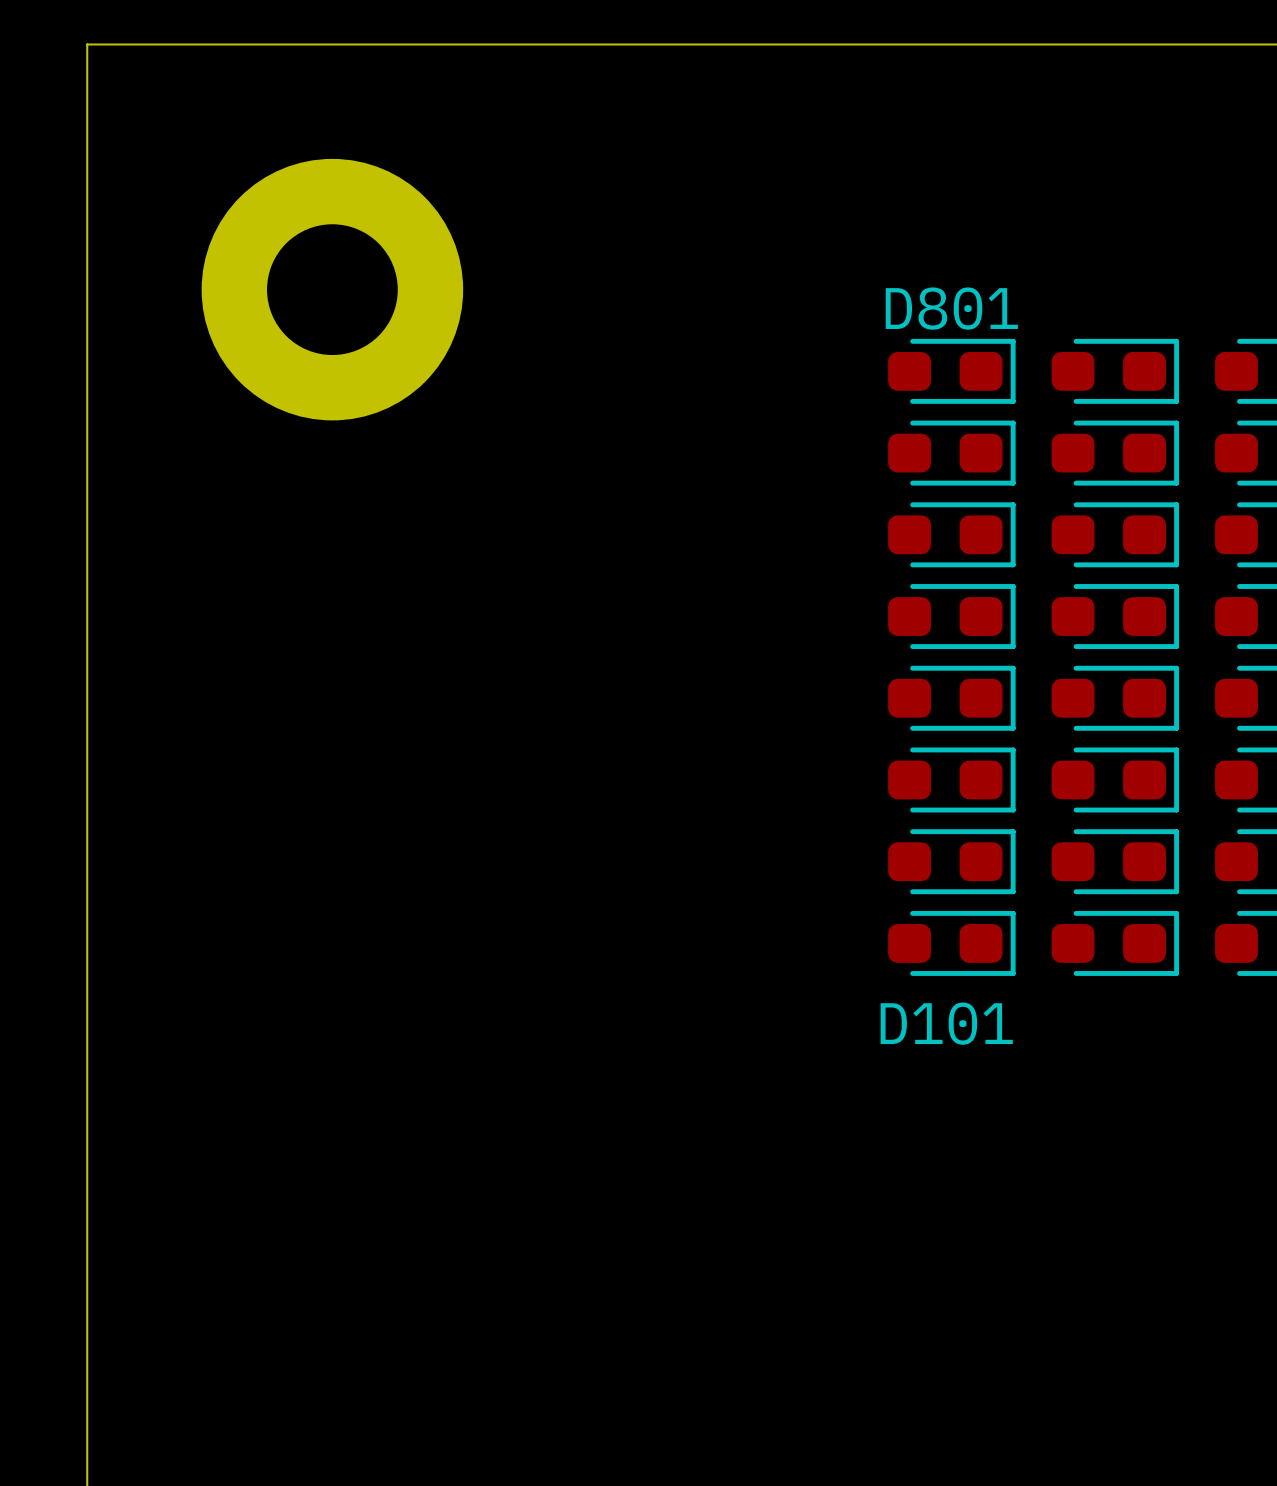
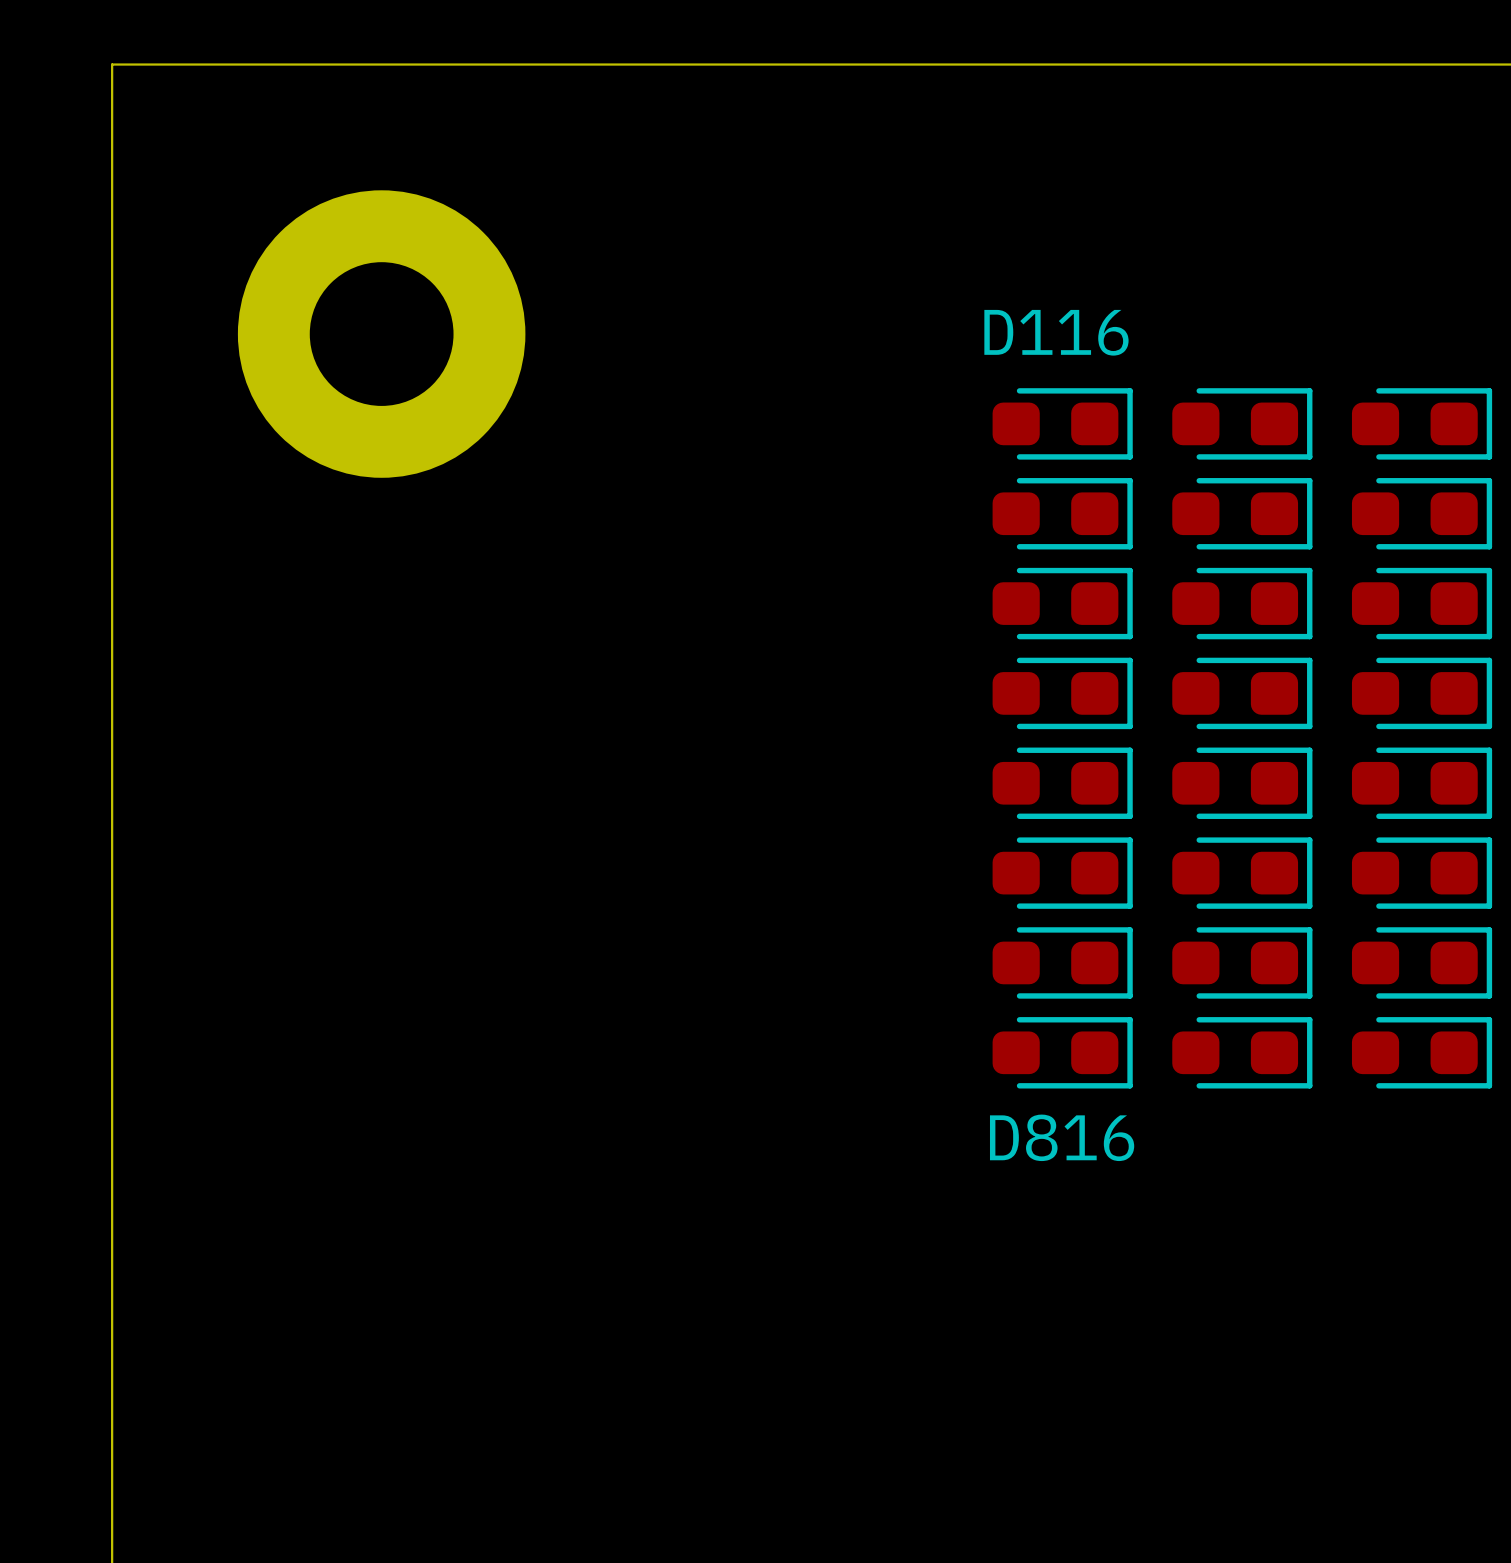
D801 name: D801 (951, 308) -> D116 (1056, 332)
D101 name: D101 (946, 1023) -> D816 (1062, 1137)

